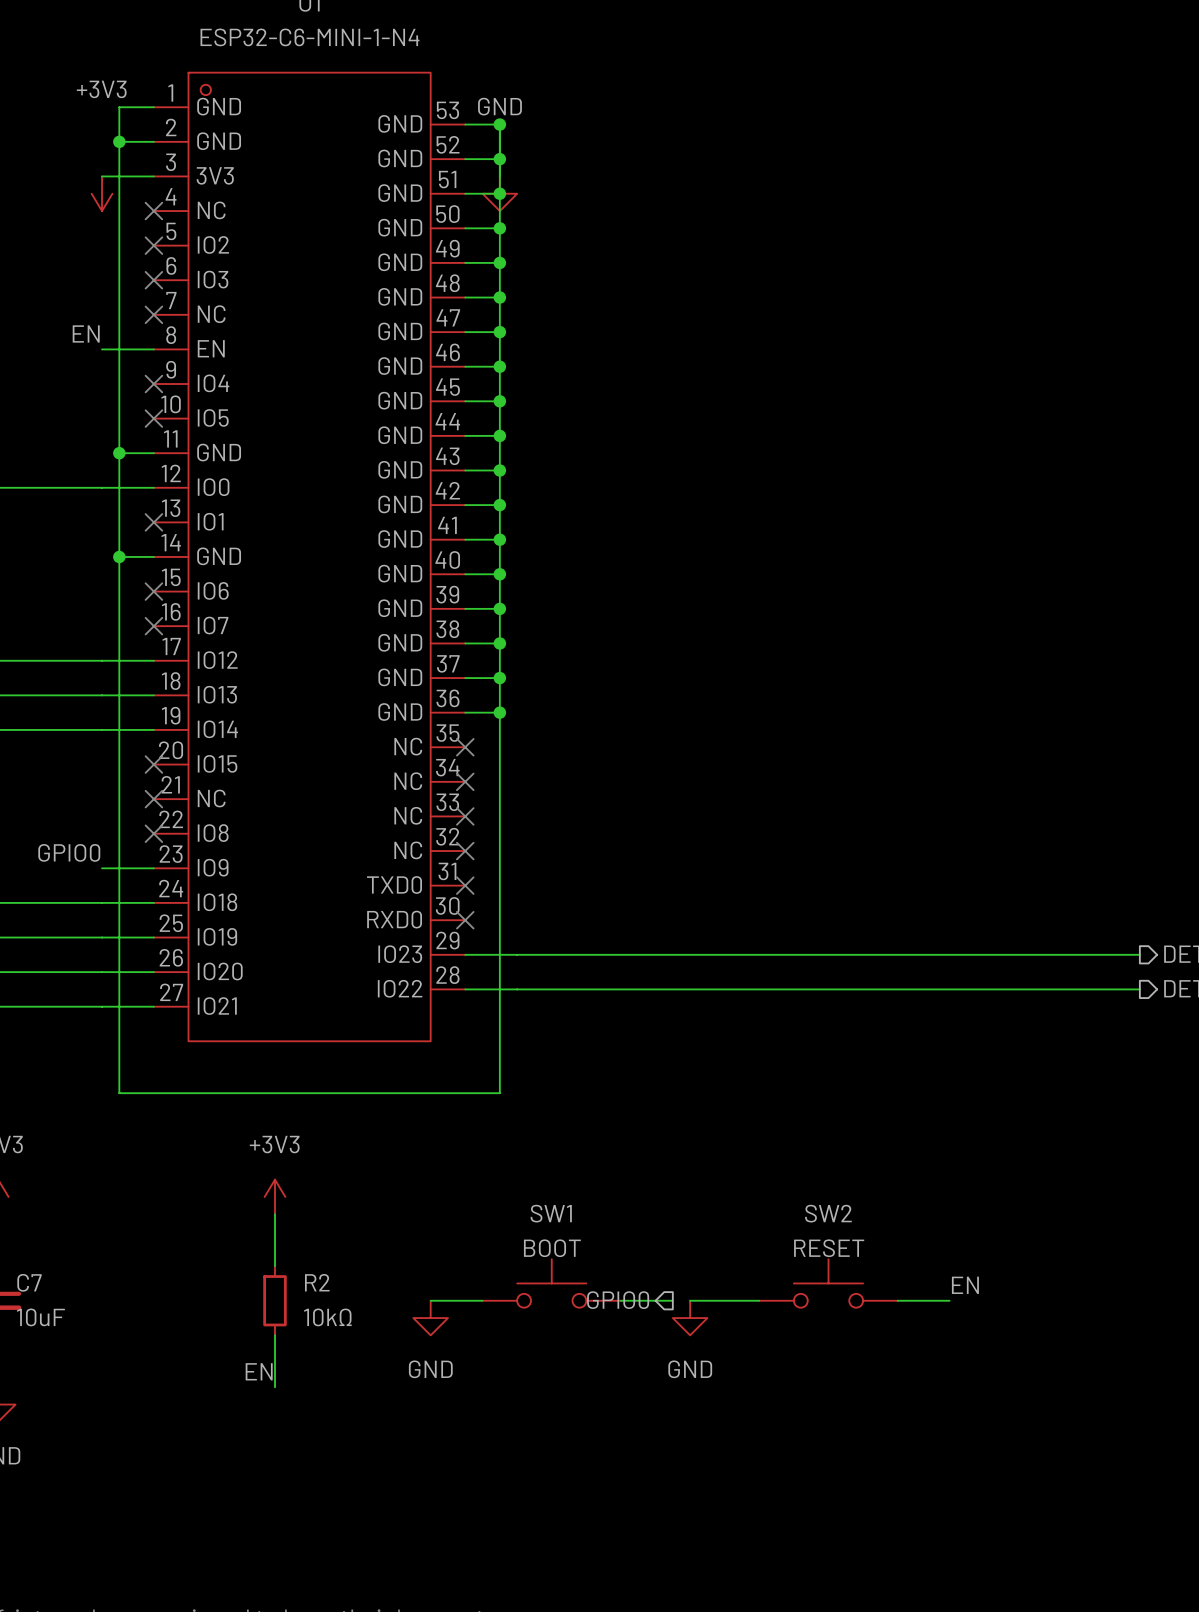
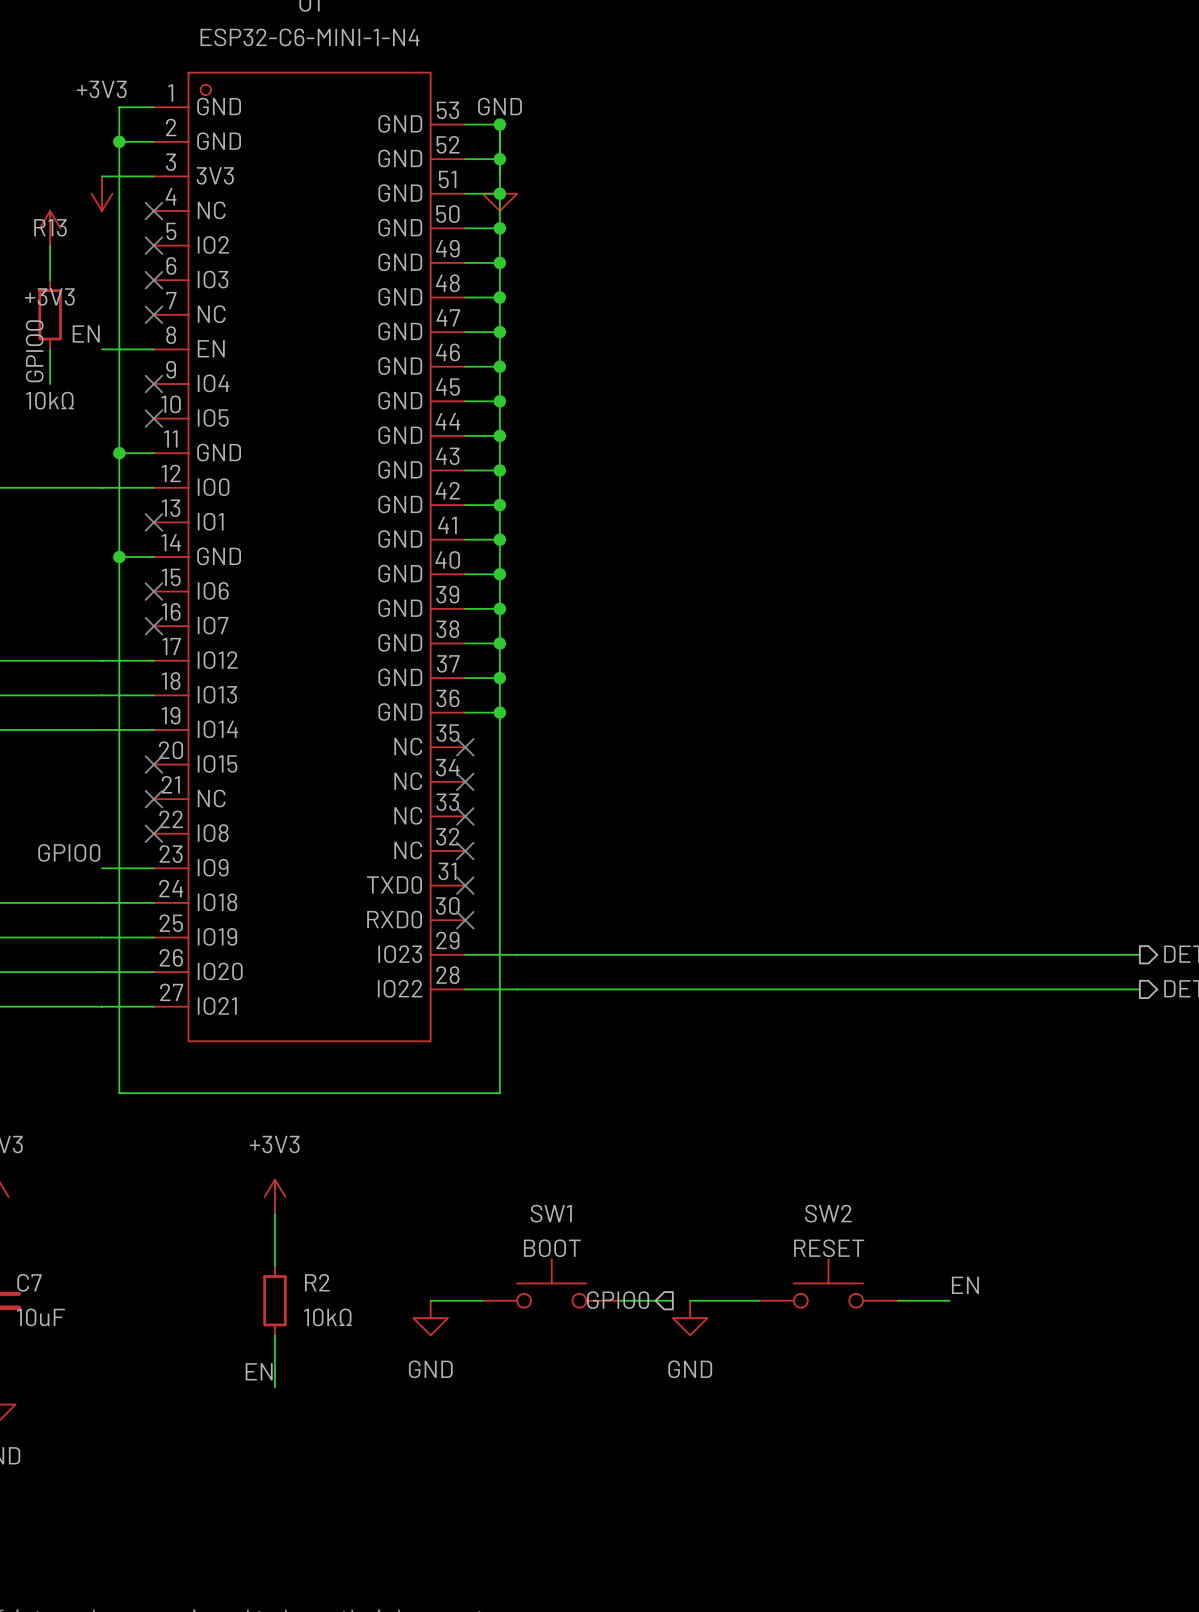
power symbol: none -> +3V3 (50, 228)
wire: none -> (50, 245) (50, 280)
R13: none -> 10kΩ (50, 314)
wire: none -> (50, 349) (50, 384)
label: none -> GPIO0 (34, 351)

